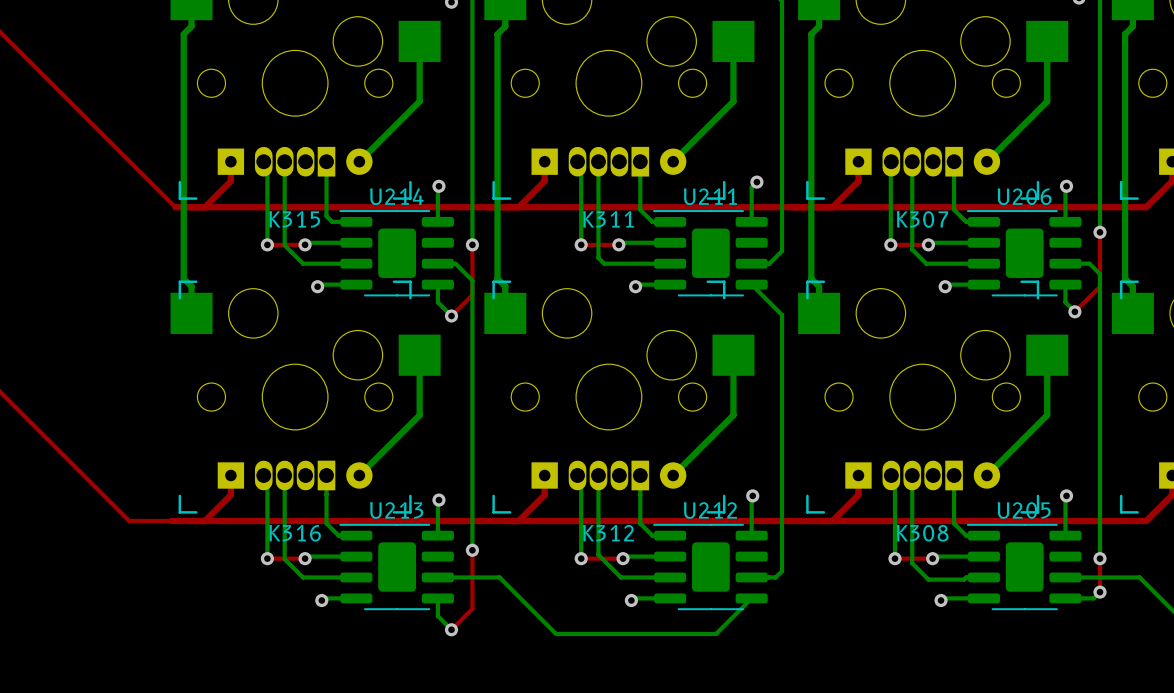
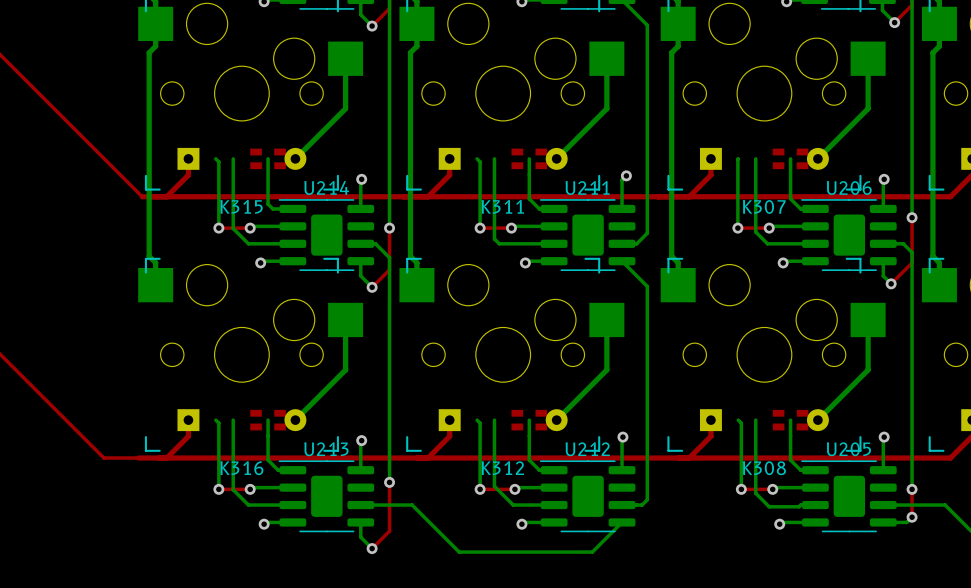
part: (295, 161) -> none
part: none -> (268, 158)
part: (608, 161) -> none
part: none -> (529, 158)
part: (922, 161) -> none
part: none -> (790, 158)
part: (295, 475) -> none
part: none -> (268, 420)
part: (608, 475) -> none
part: none -> (529, 420)
part: (922, 475) -> none
part: none -> (790, 420)

